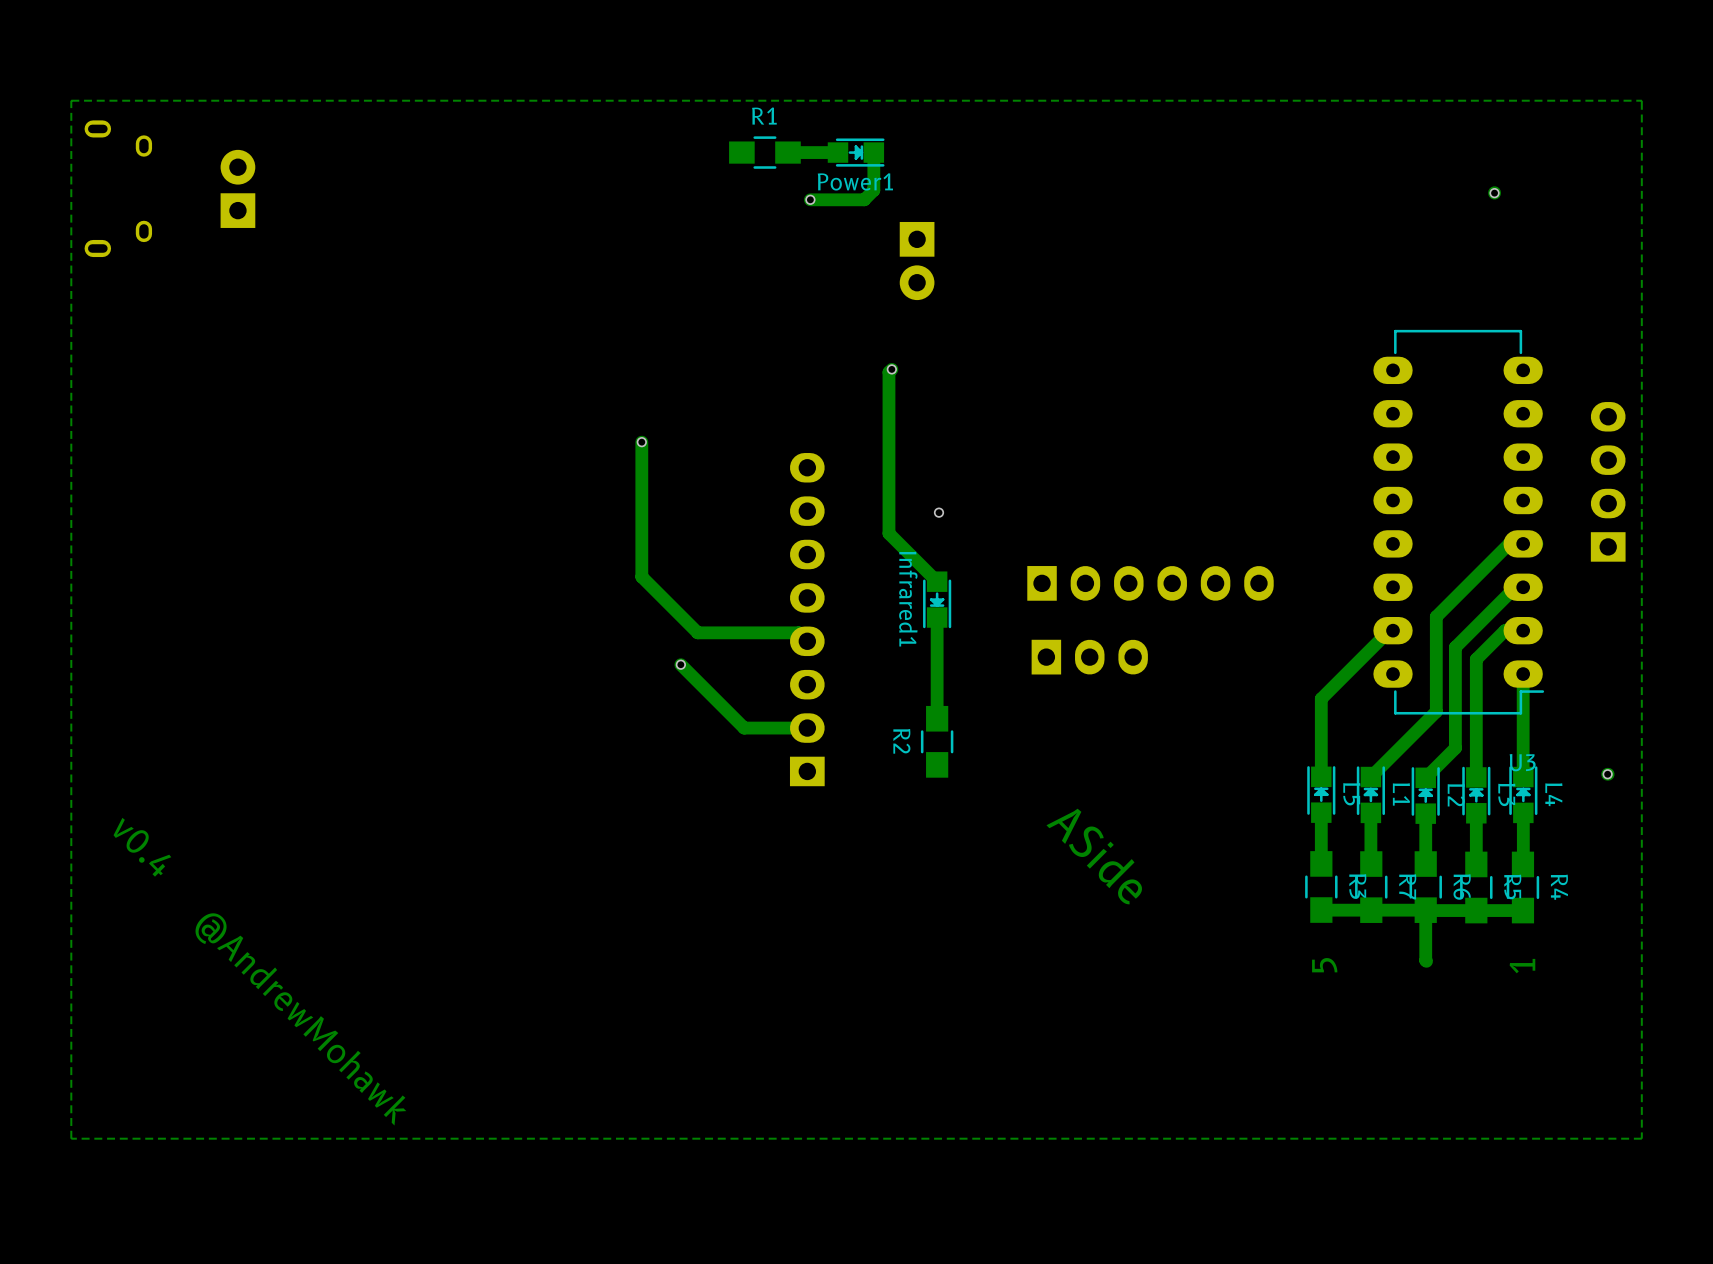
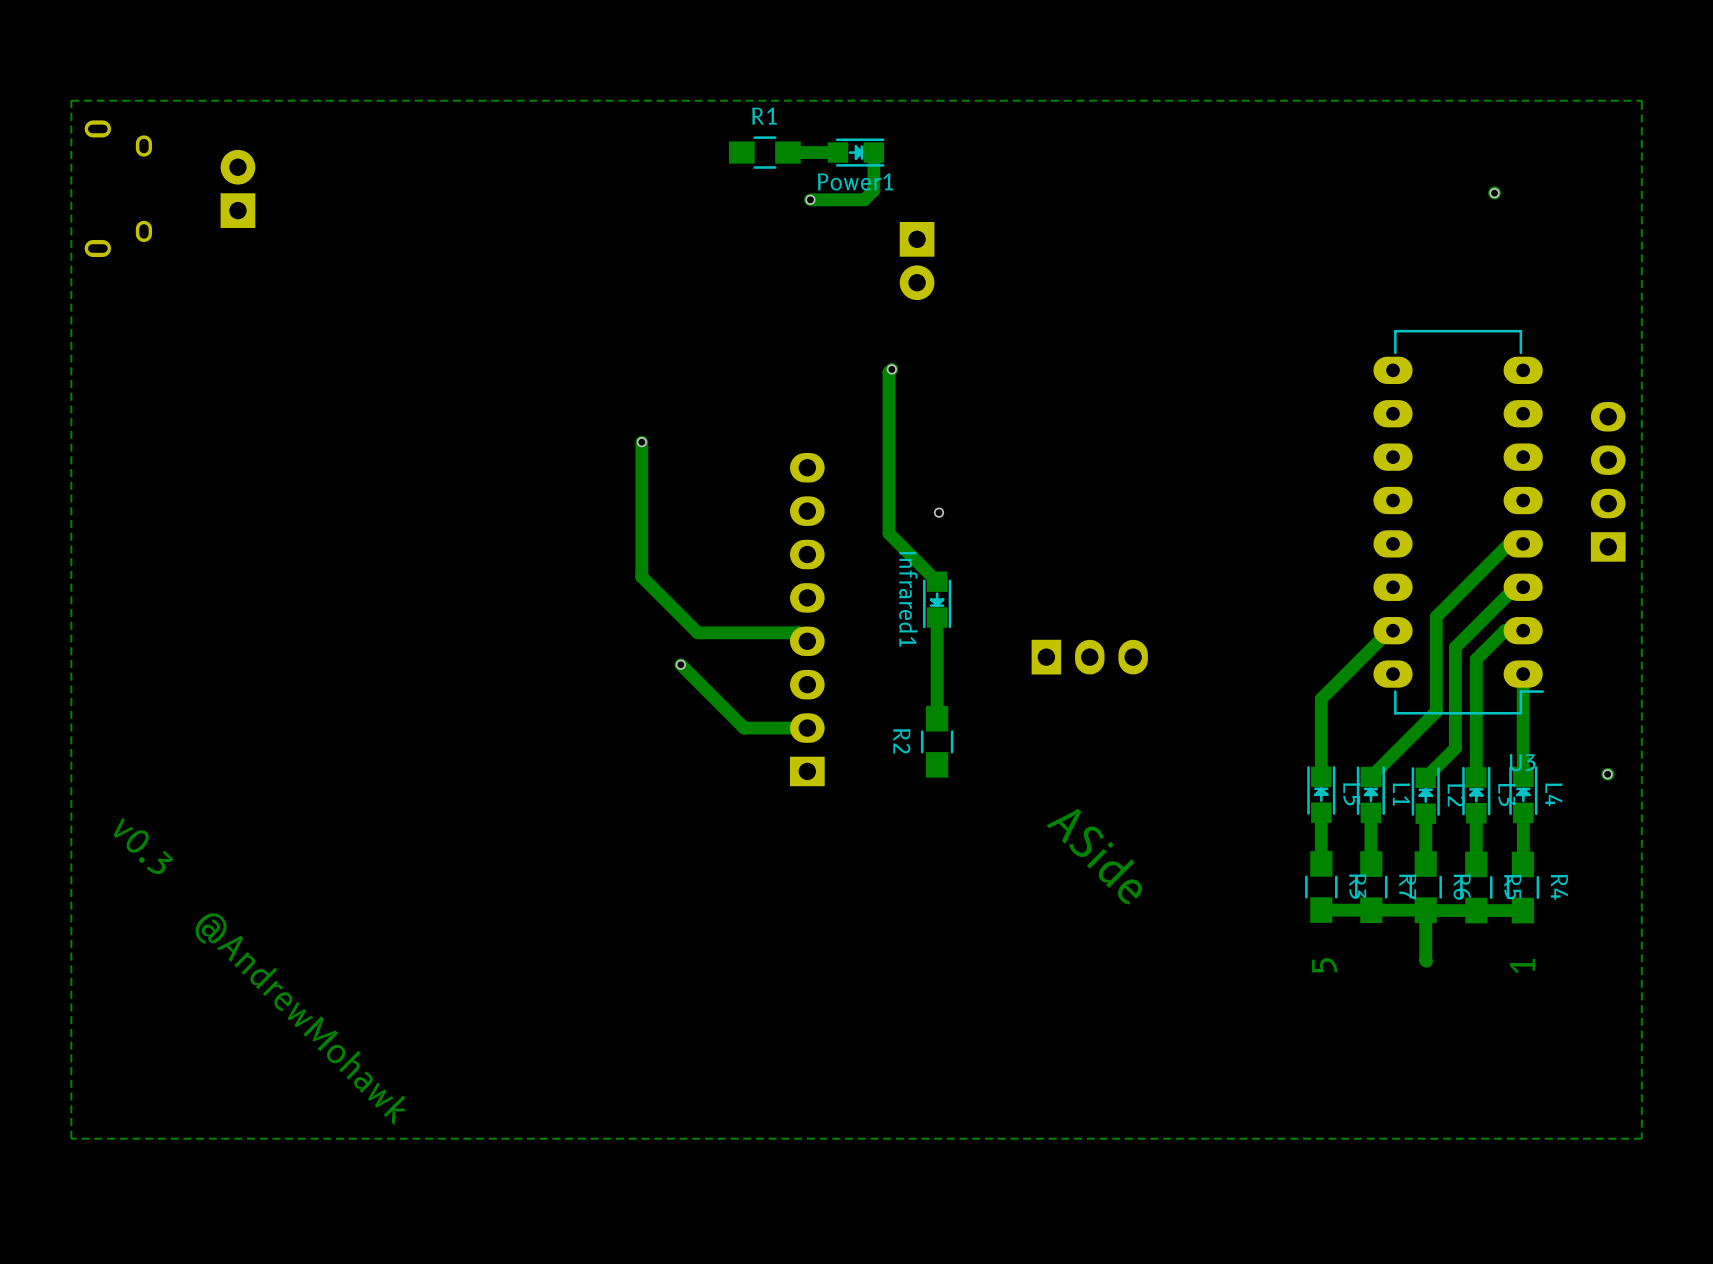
part: (1150, 583) -> none
text: v0.4 (142, 847) -> v0.3 (143, 845)

